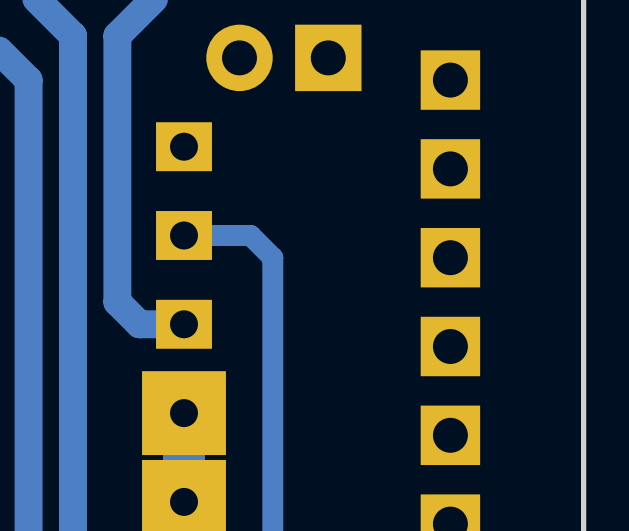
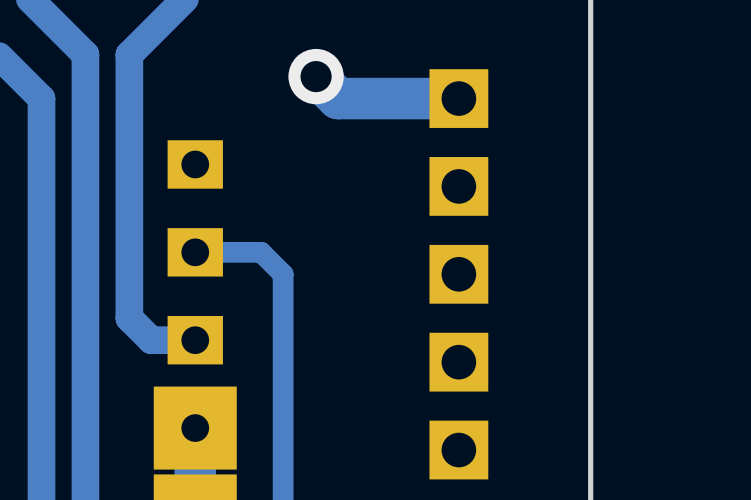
part: (283, 57) -> none
track: none -> (316, 76) (338, 98) (458, 98)
via: none -> (316, 76)

